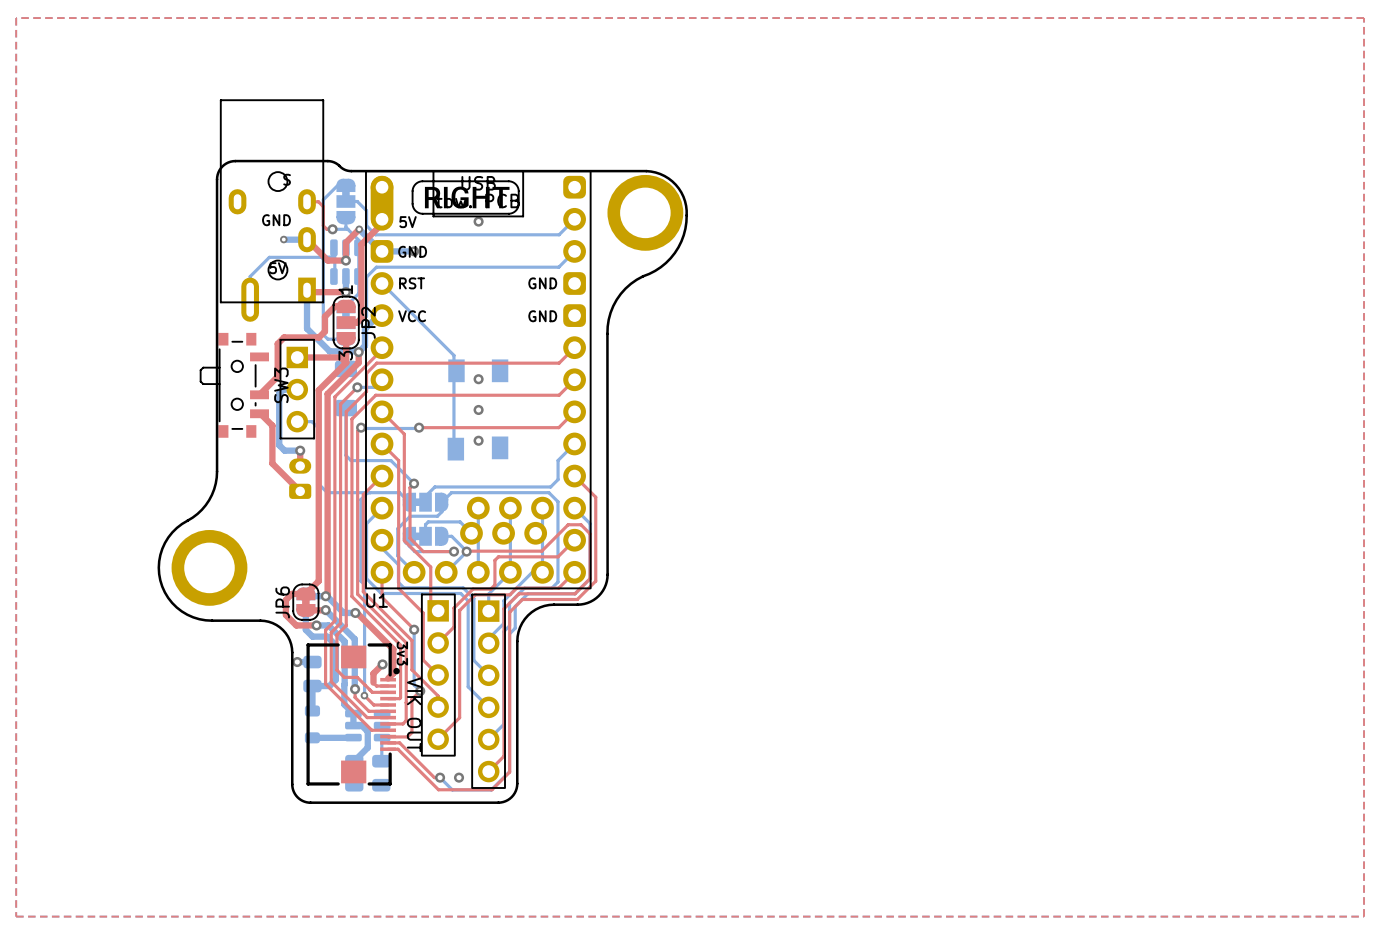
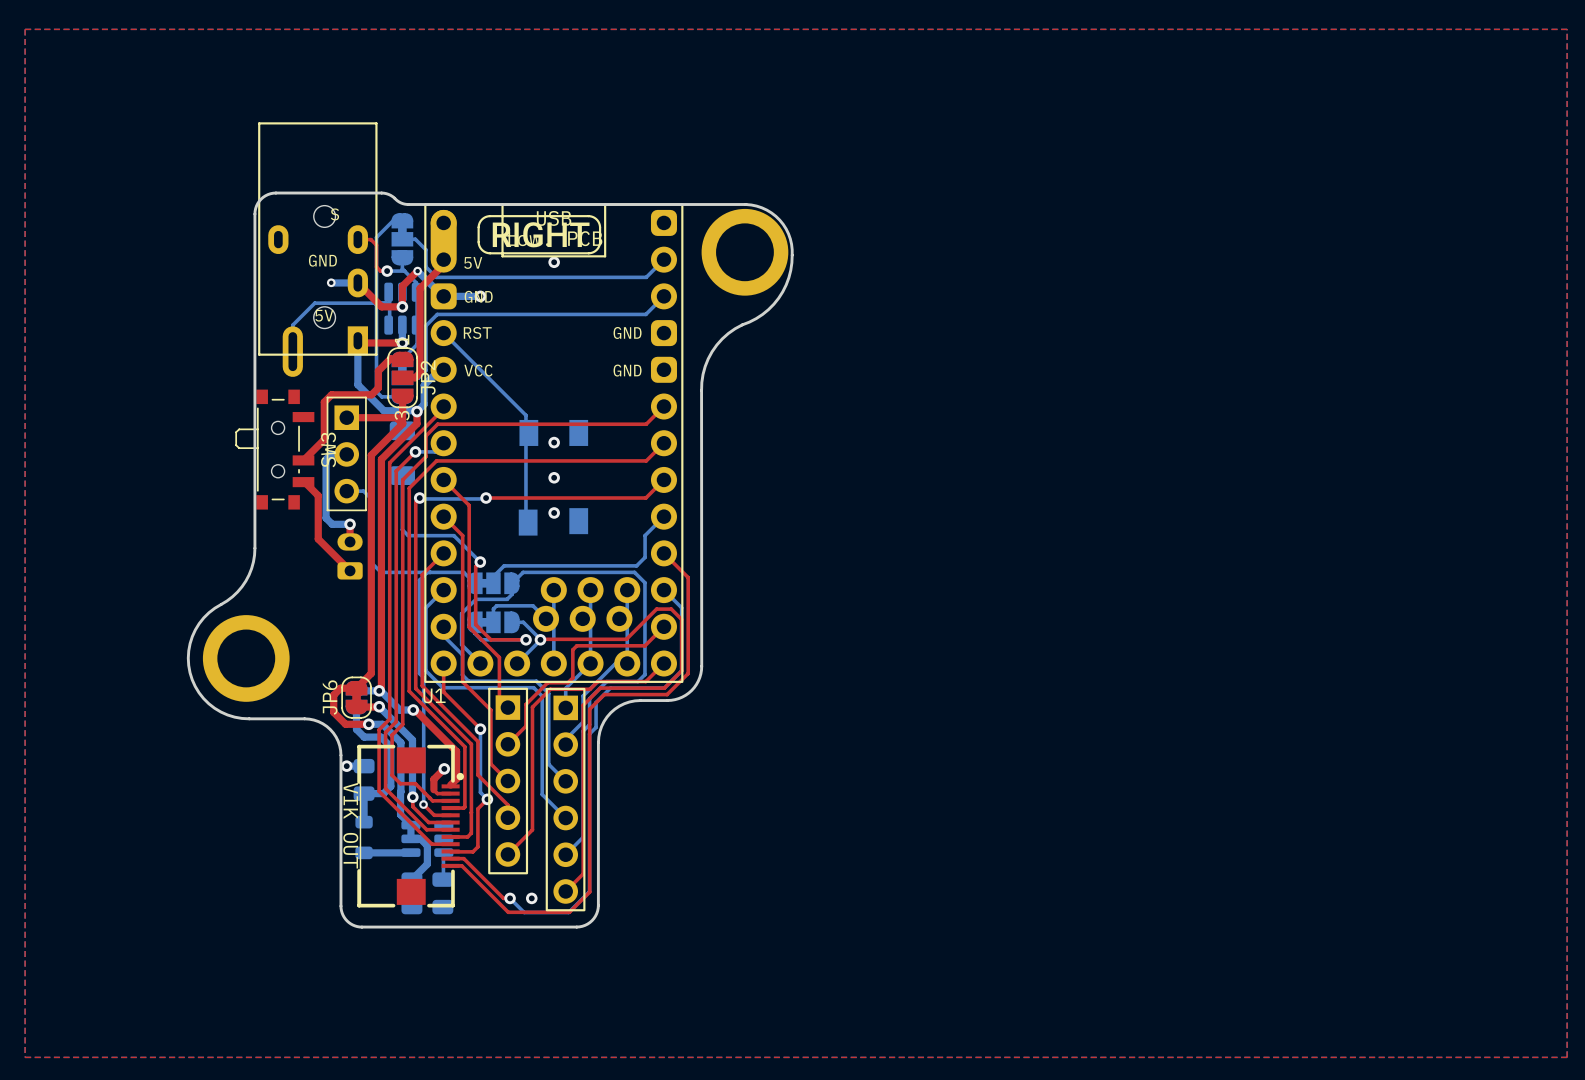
part footprint: [306, 643, 400, 786] -> [357, 744, 464, 908]

